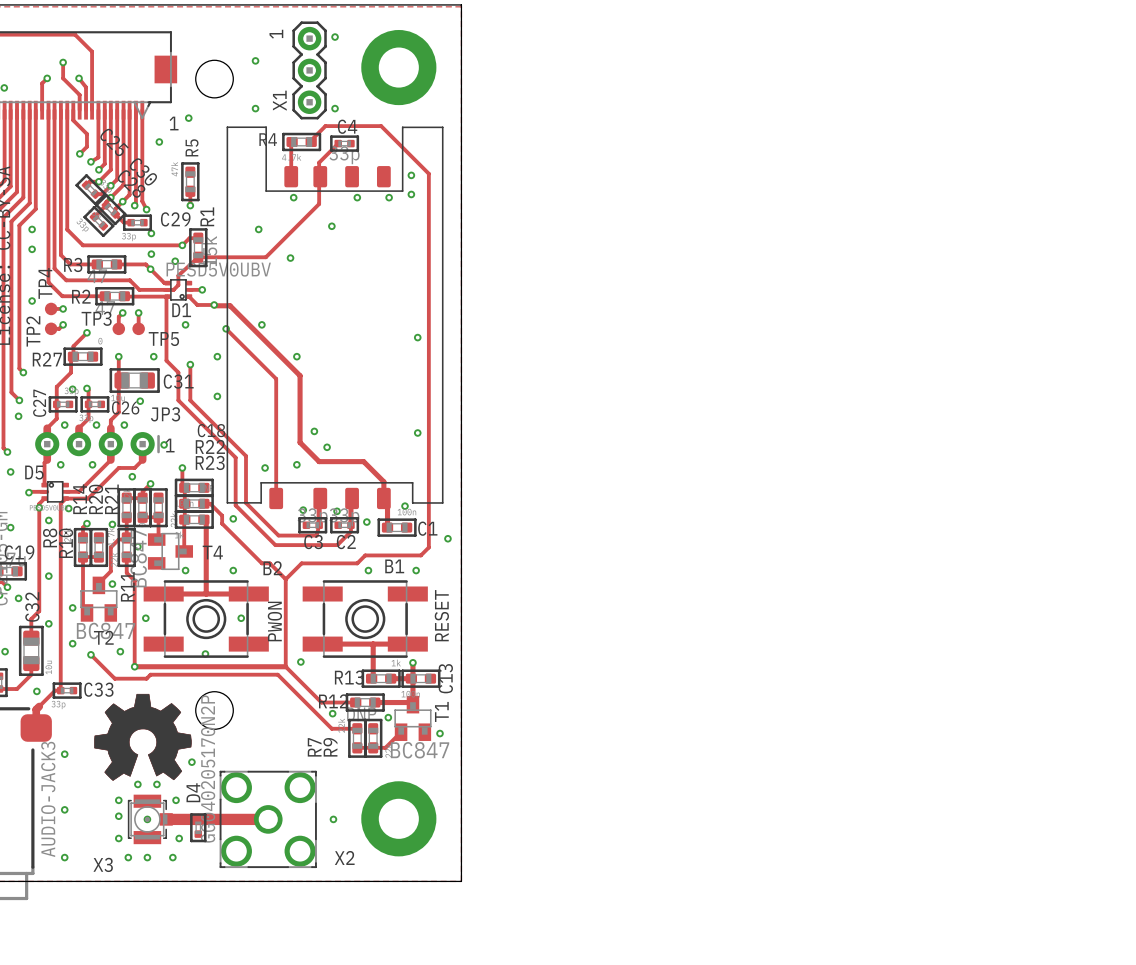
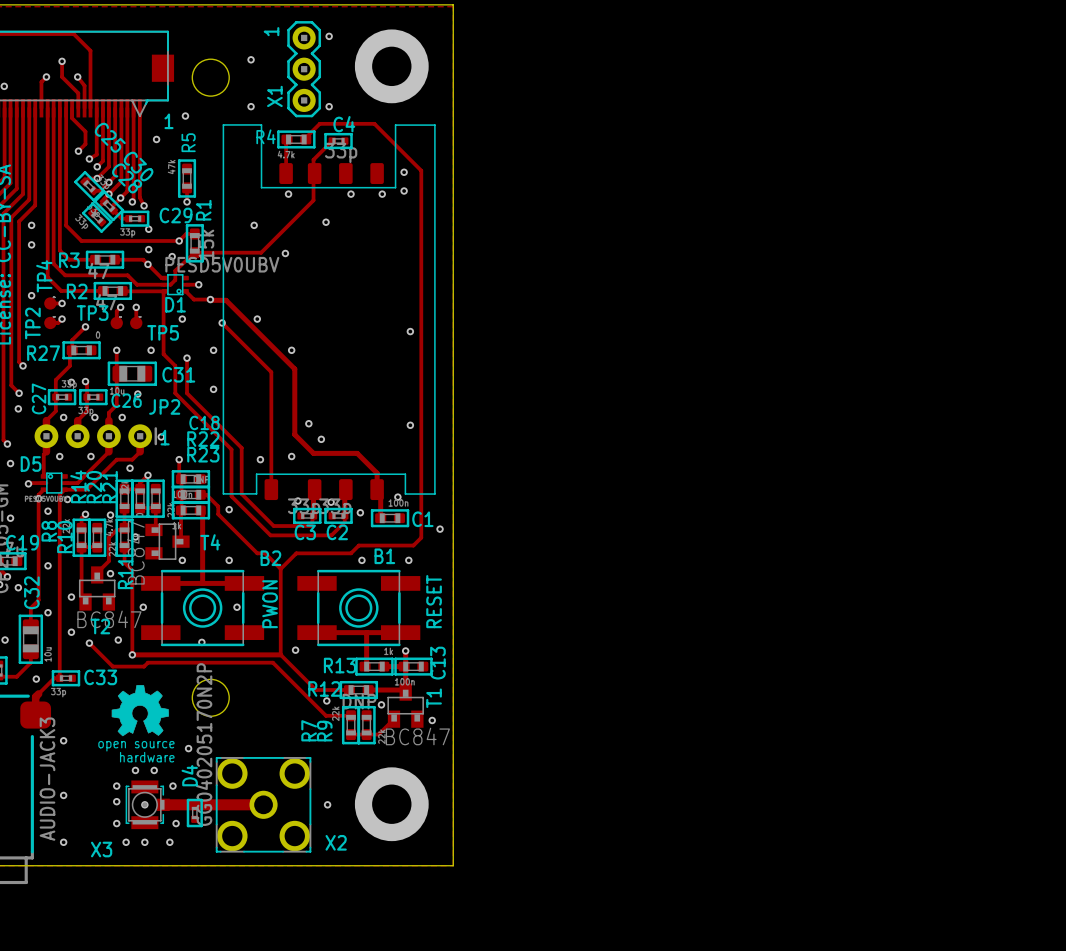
JP3 name: JP3 (165, 414) -> JP2 (164, 406)
drawing: [94, 693, 192, 781] -> none
drawing: none -> [111, 685, 169, 737]

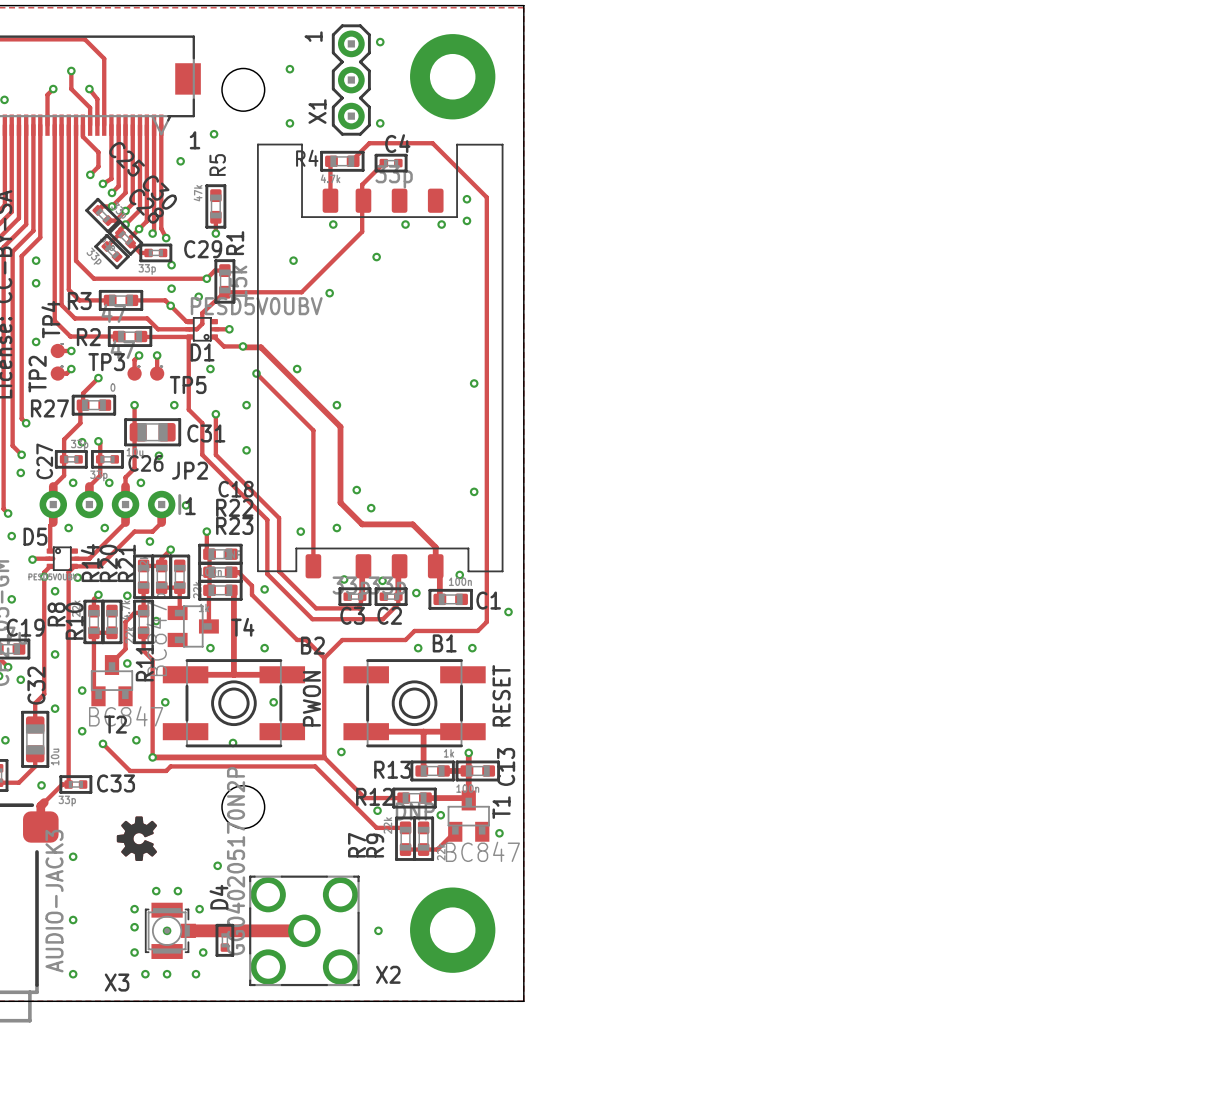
drawing: [111, 685, 169, 737] -> none
drawing: none -> [116, 816, 157, 861]

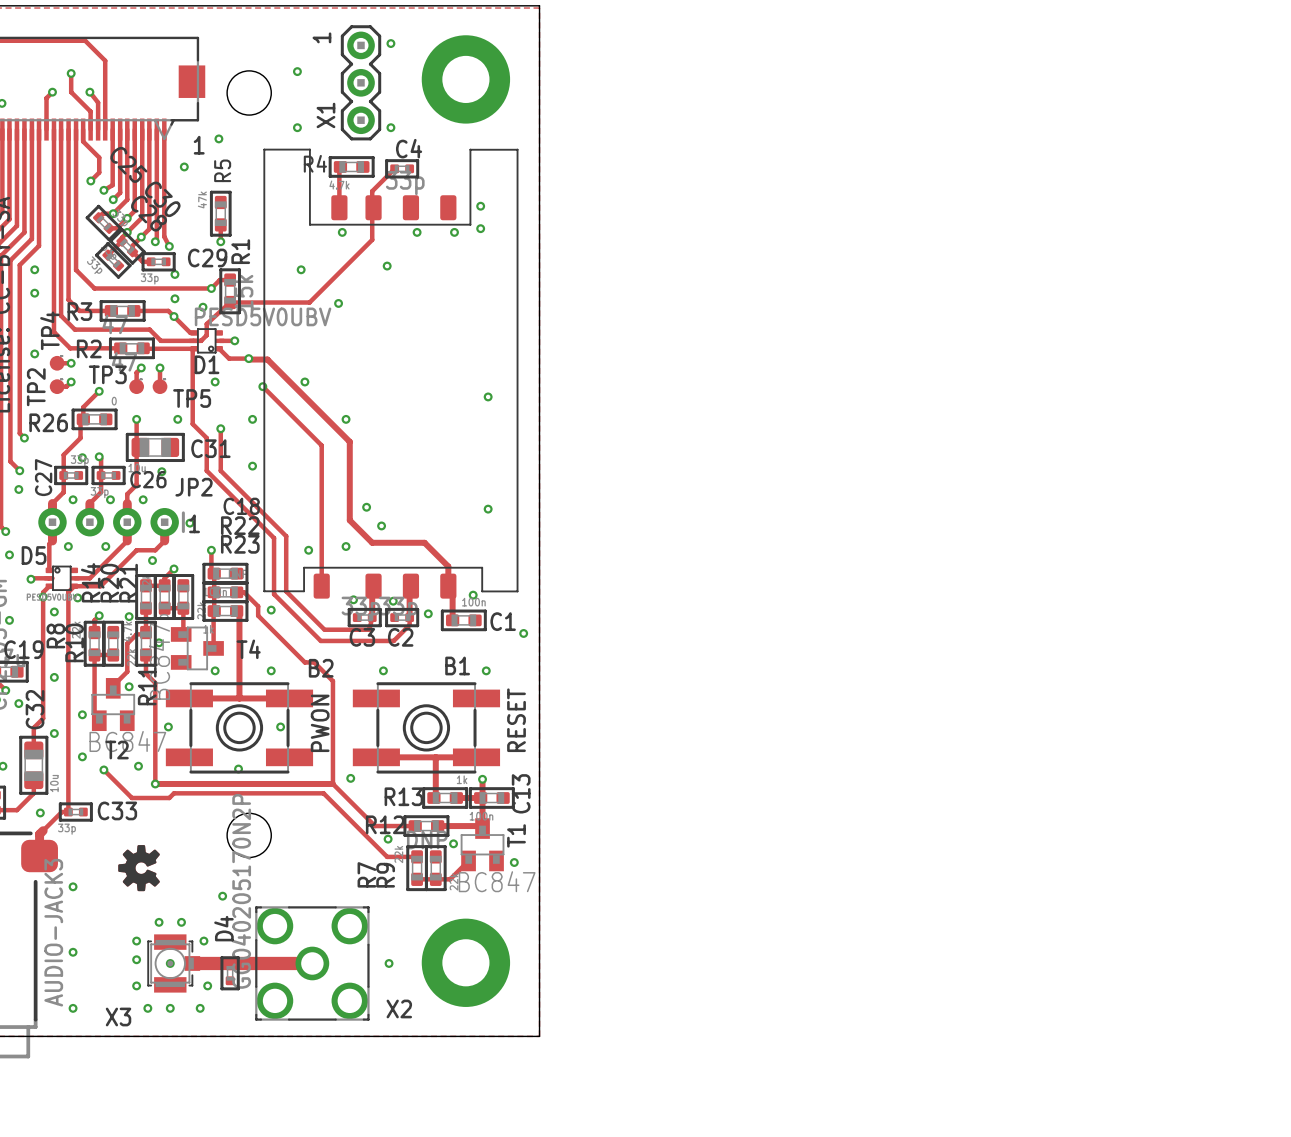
track: (353, 161) (369, 143) (432, 143) (486, 197) (486, 621) (477, 630) (414, 630) (405, 640) (342, 640) (324, 658) -> none
R27 name: R27 (49, 408) -> R26 (48, 422)
via position: (418, 648) -> (383, 670)

